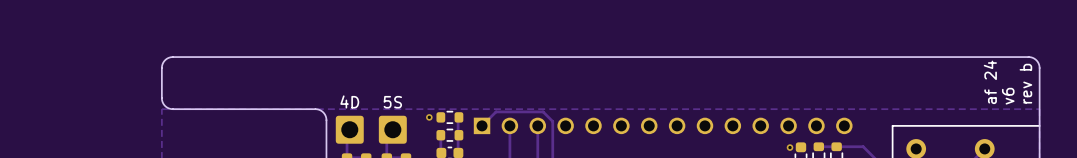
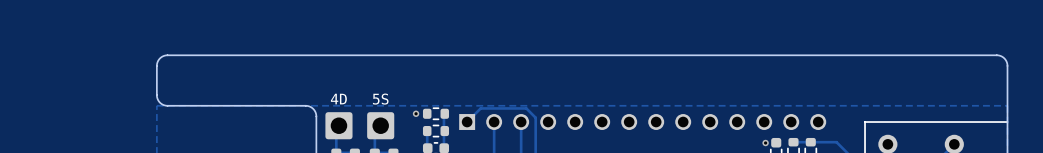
text: af 24 (990, 82) -> none
text: rev b (1025, 83) -> none
text: v6 (1008, 96) -> none

